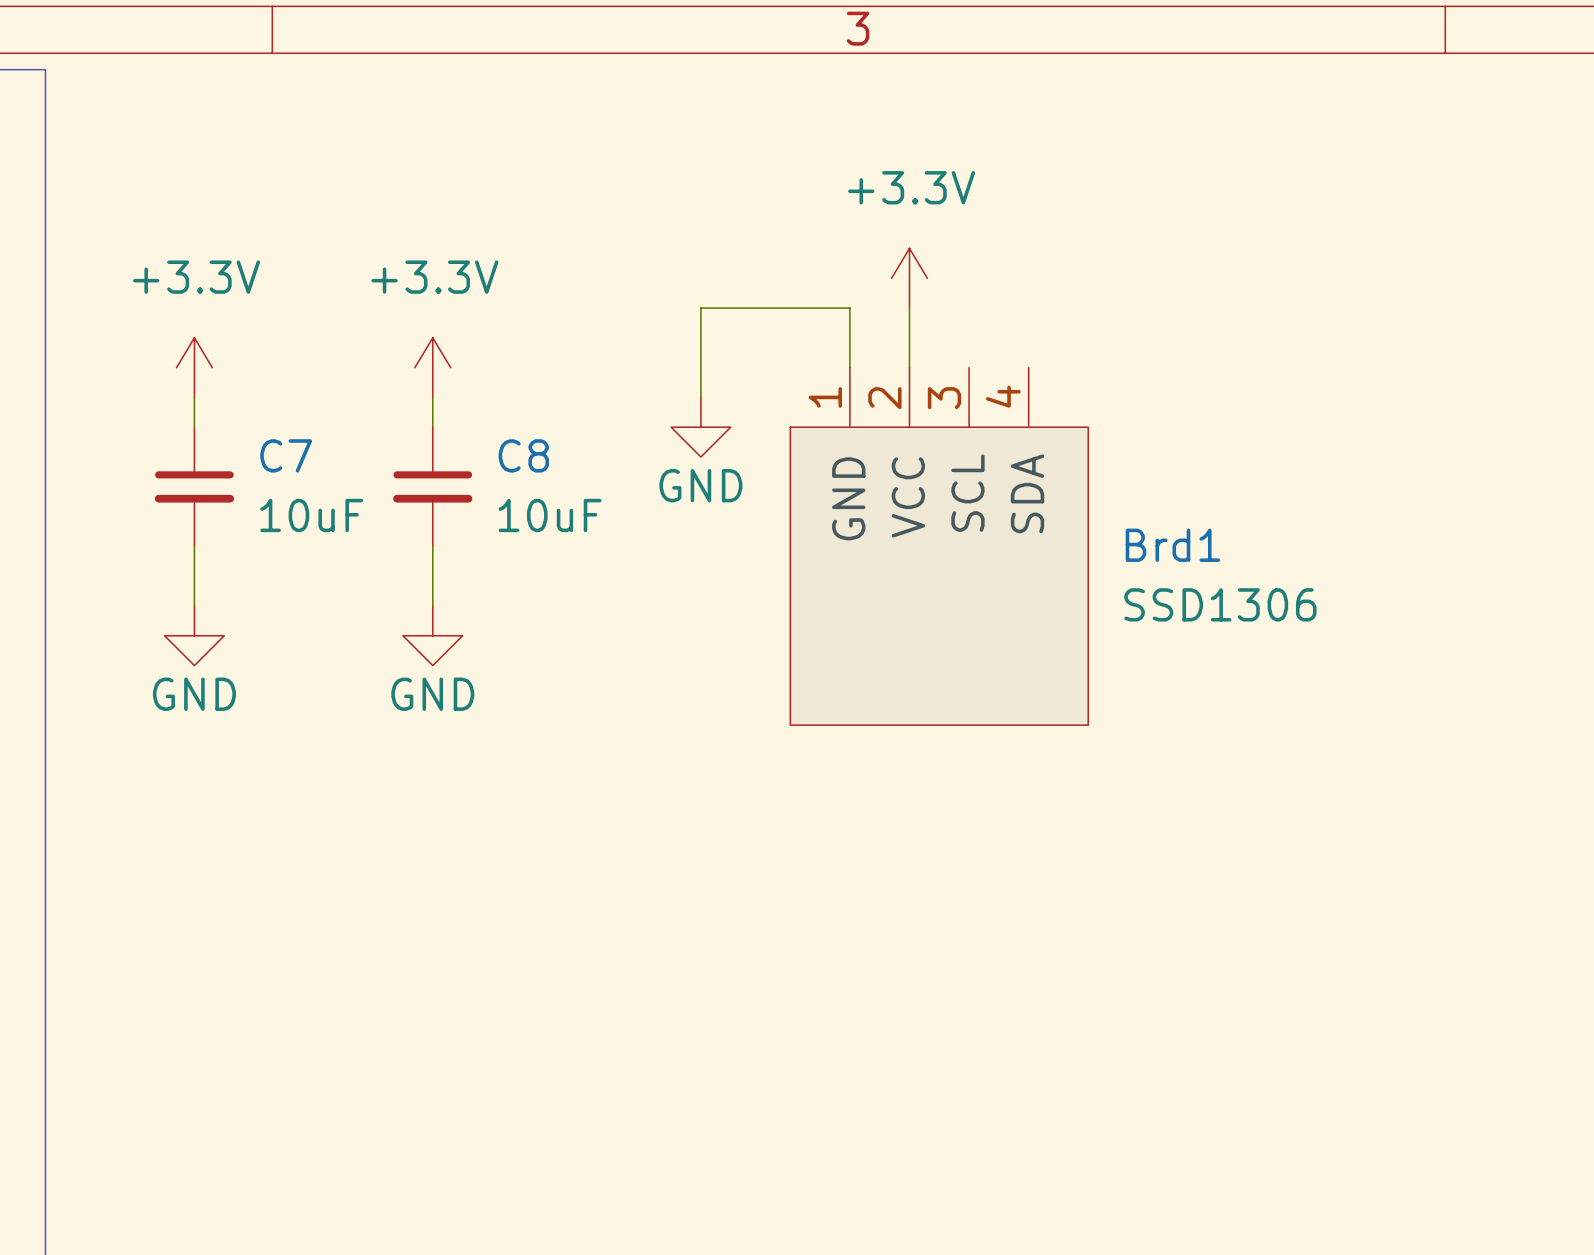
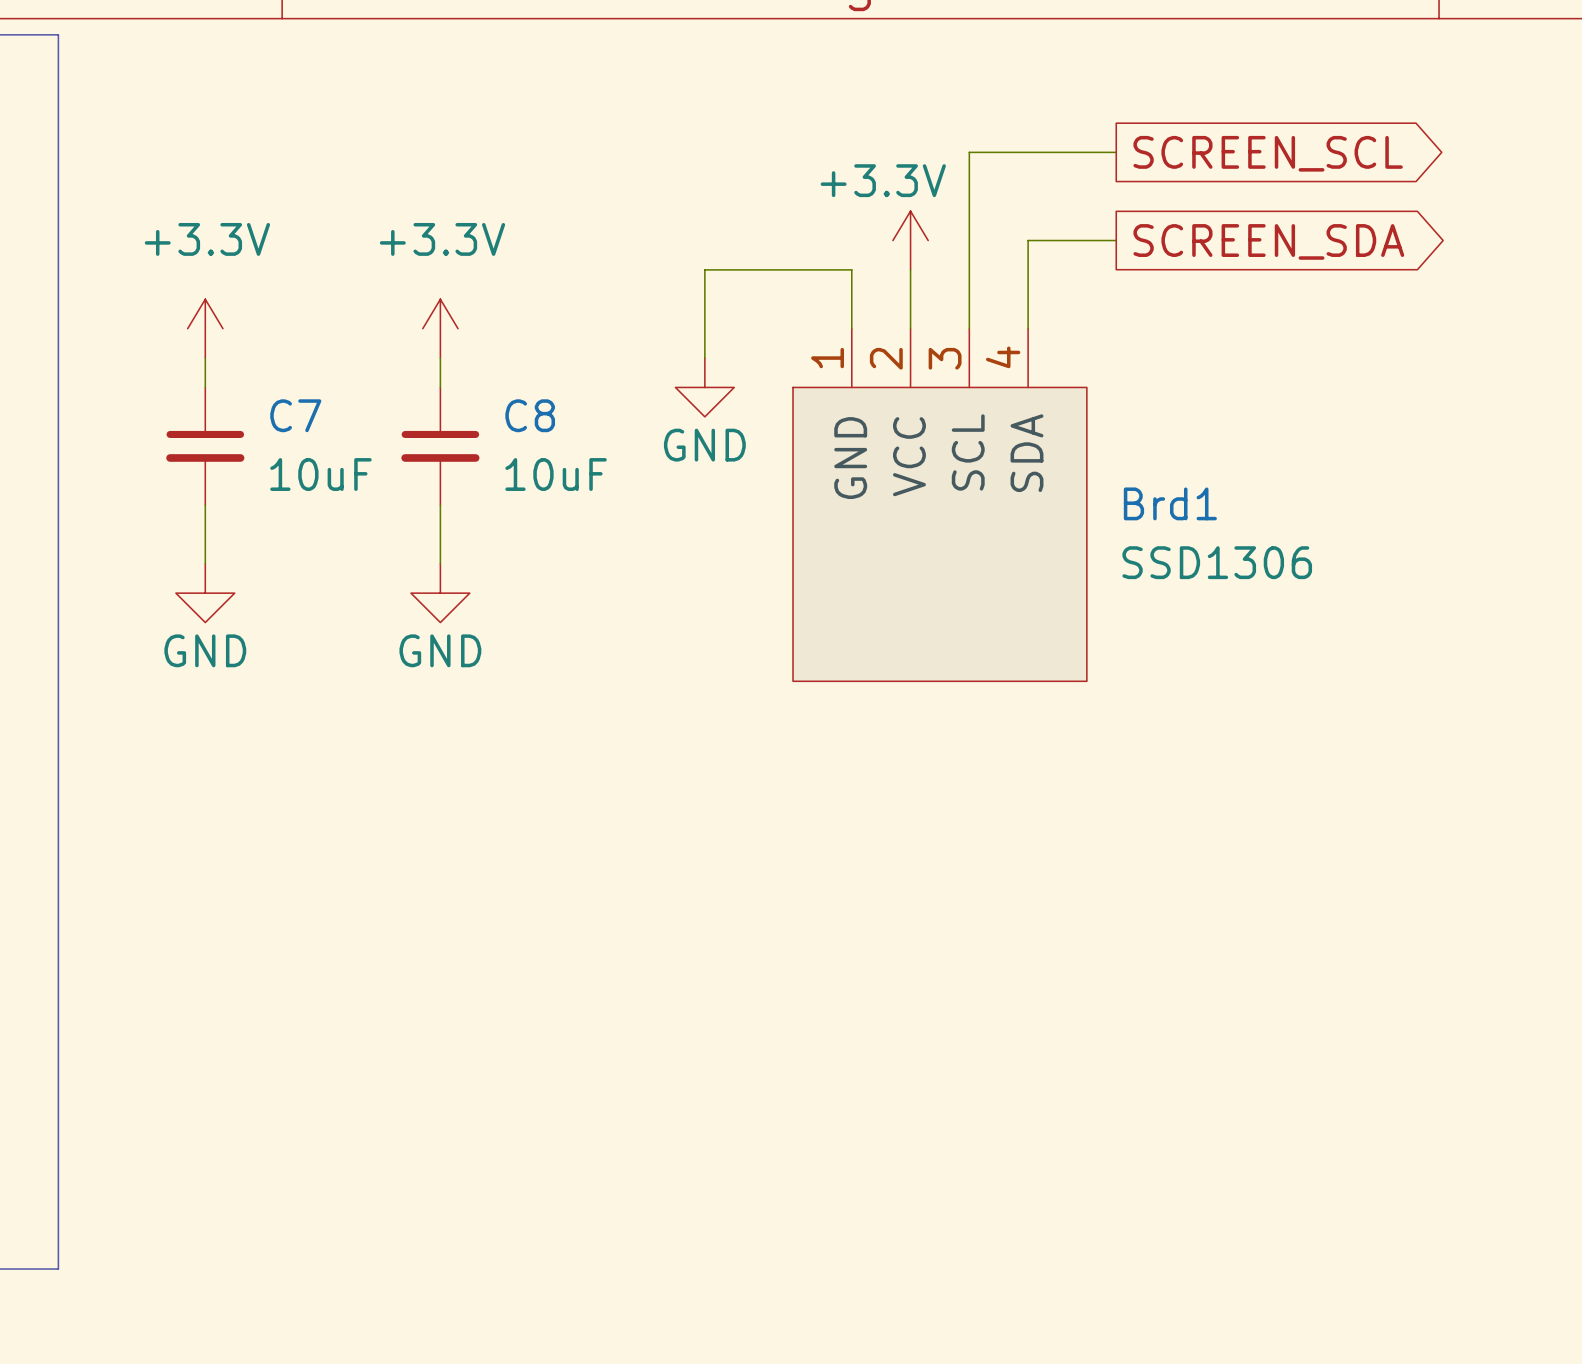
power symbol text position: +3.3V (911, 187) -> +3.3V (883, 180)
wire: none -> (1116, 152) (969, 152) (969, 328)
global label: none -> SCREEN_SCL (1268, 153)
wire: none -> (1116, 240) (1028, 240) (1028, 328)
global label: none -> SCREEN_SDA (1268, 241)

